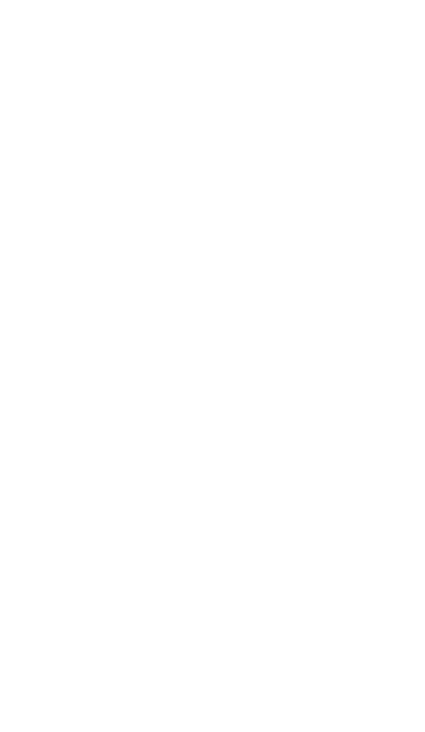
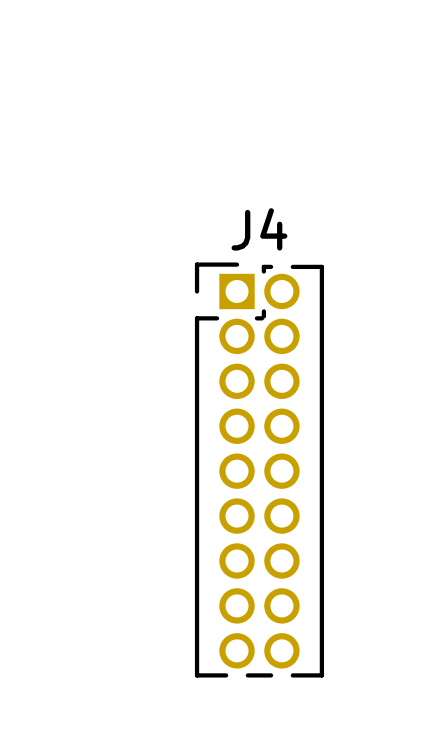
J4: none -> (259, 470)

